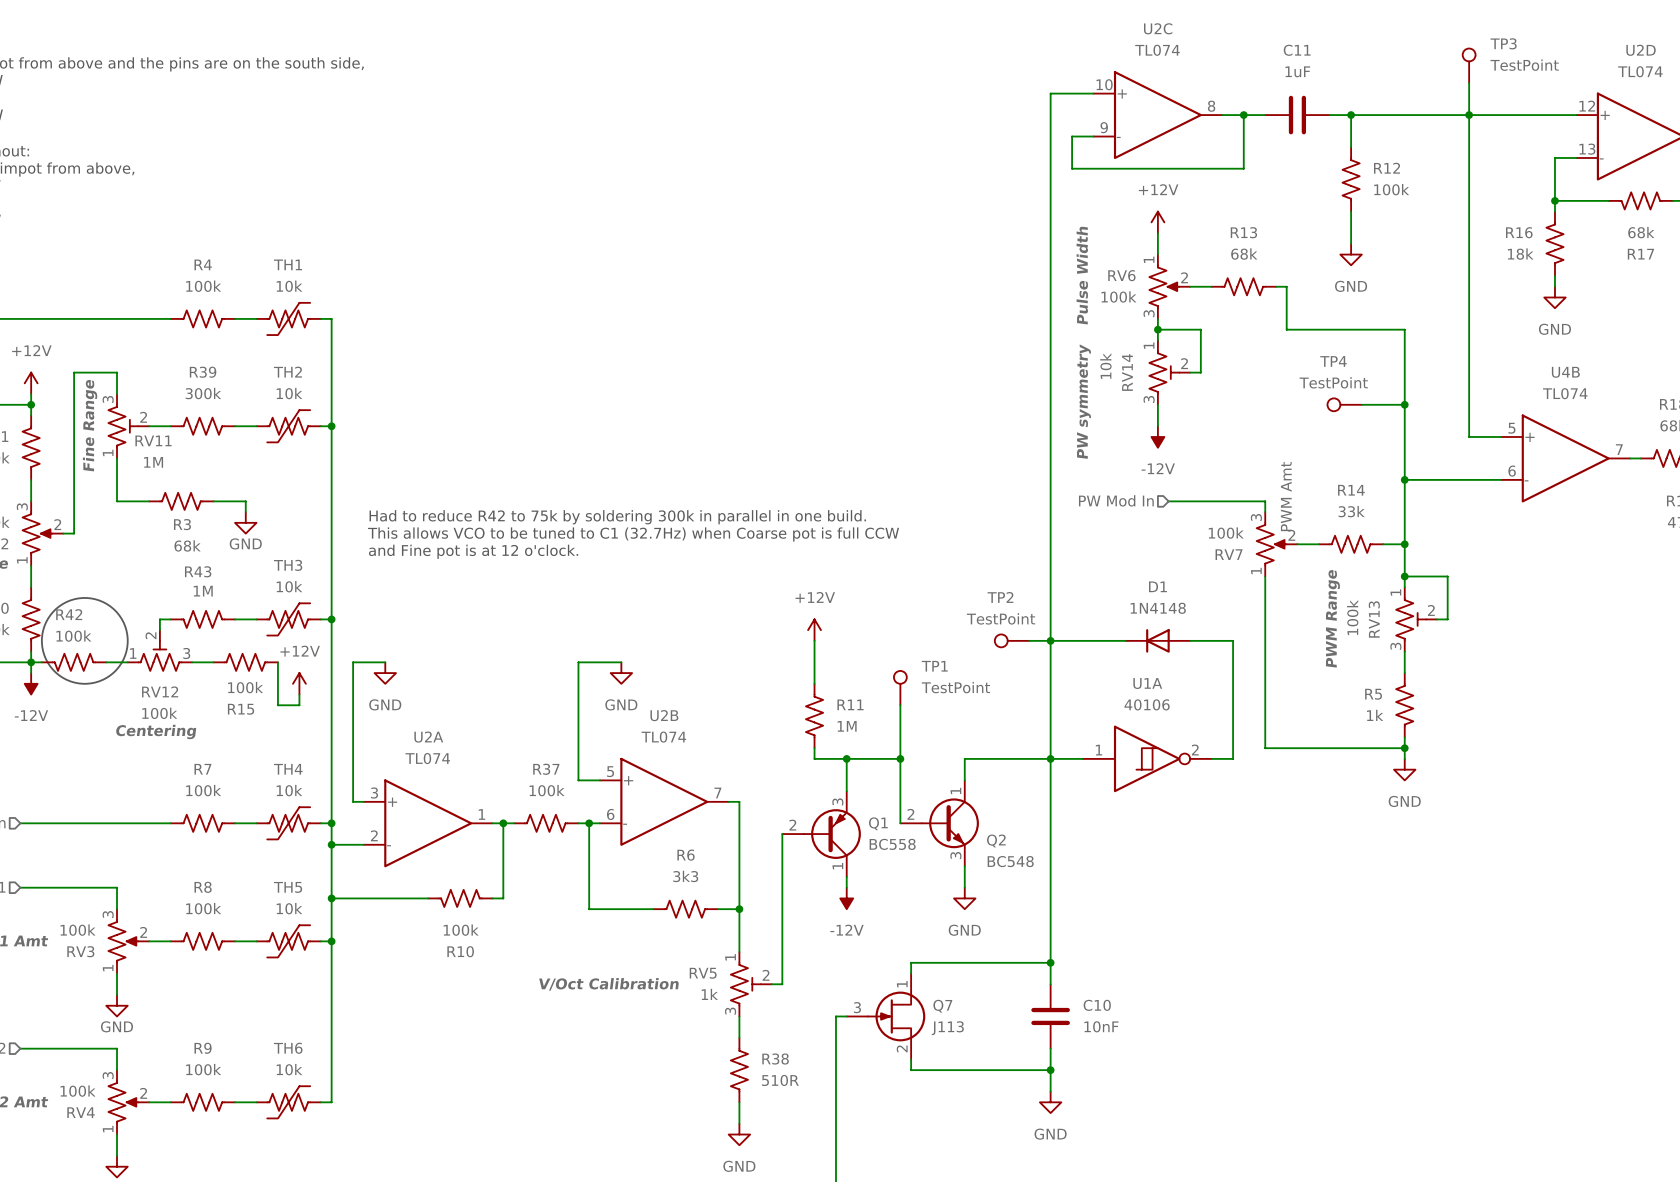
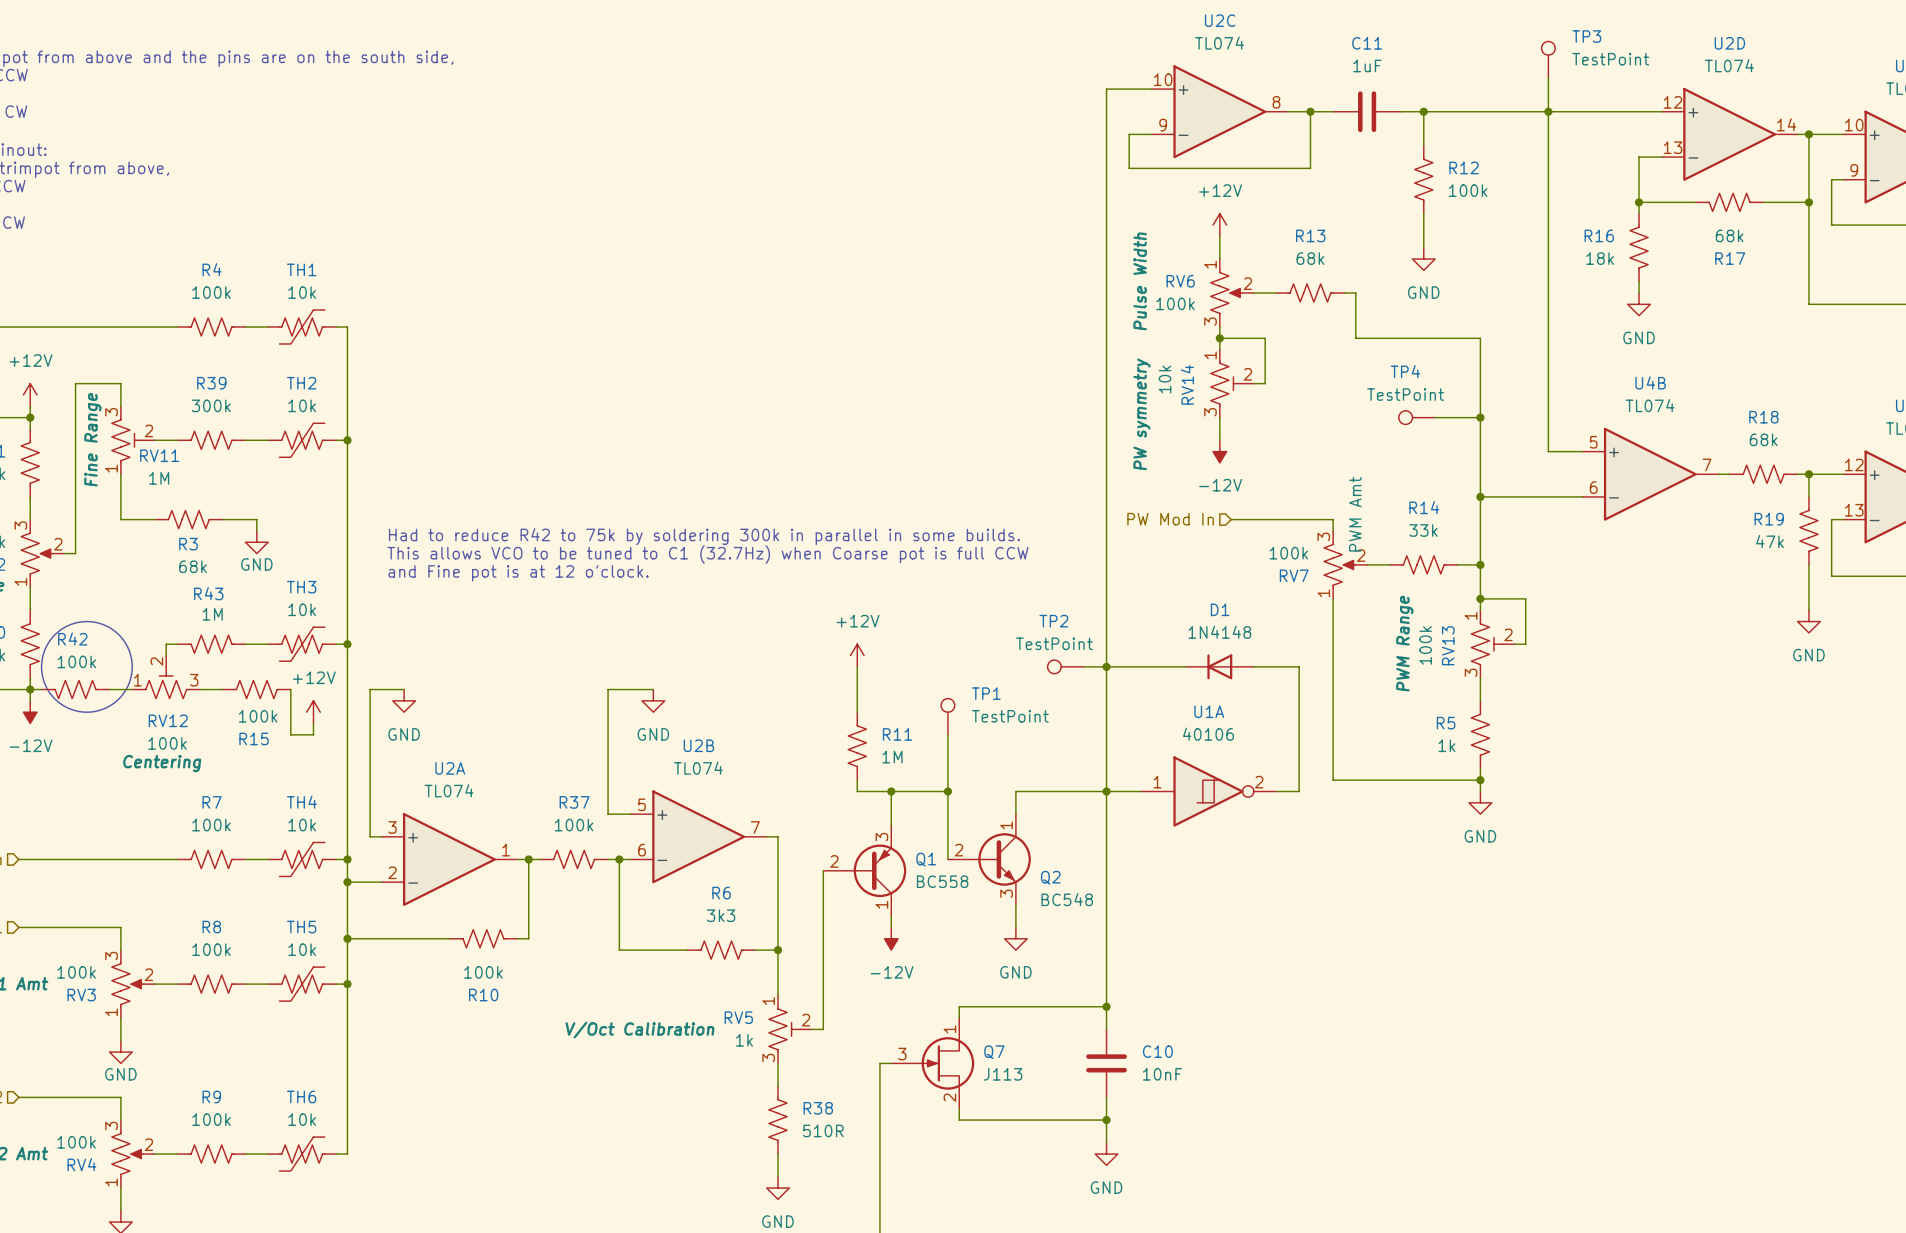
text: Had to reduce R42 to 75k by soldering 300k in parallel in one build. (617, 517) -> Had to reduce R42 to 75k by soldering 300k in parallel in some builds. (704, 536)

